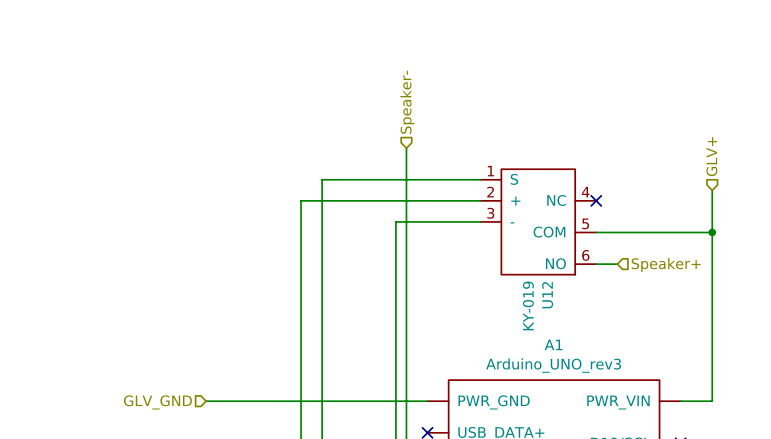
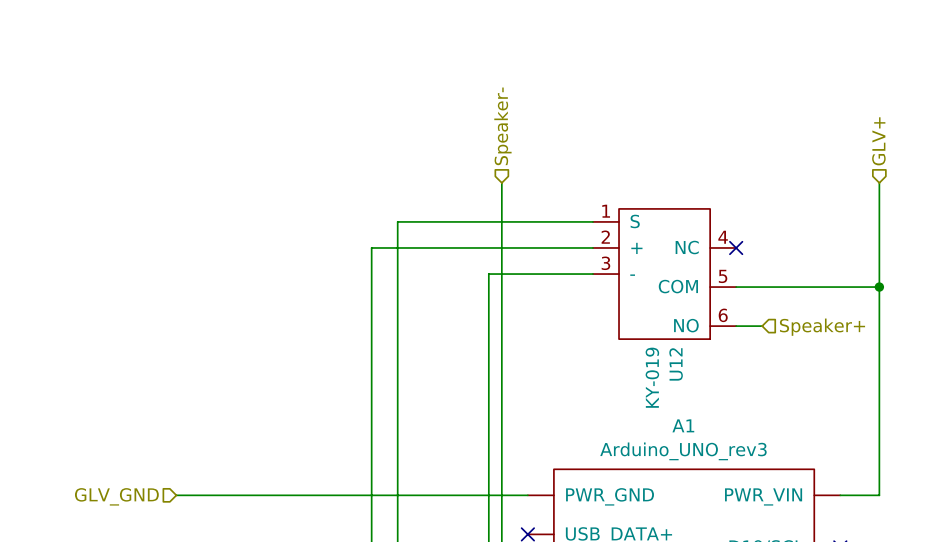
wire: none -> (879, 182) (879, 234)
hierarchical label position: GLV+ (711, 156) -> GLV+ (878, 141)
wire: none -> (176, 495) (254, 495)
hierarchical label position: GLV_GND (157, 402) -> GLV_GND (116, 496)

